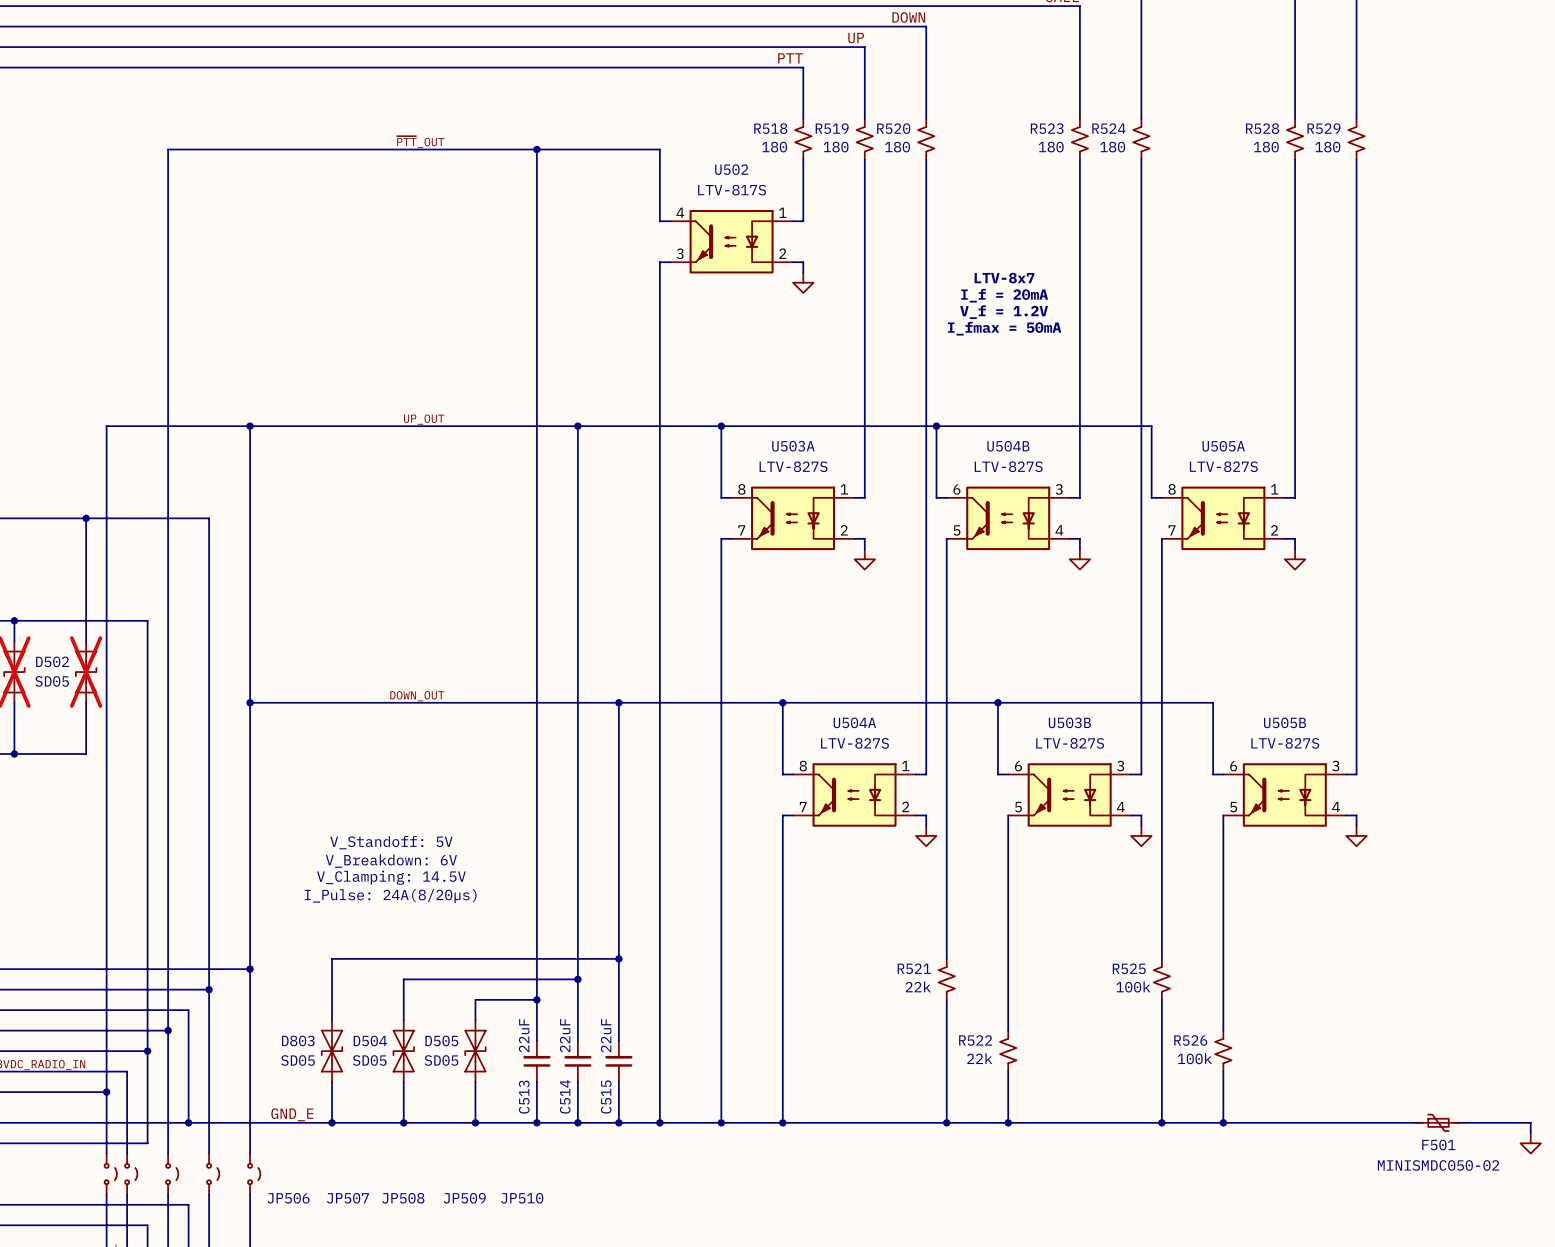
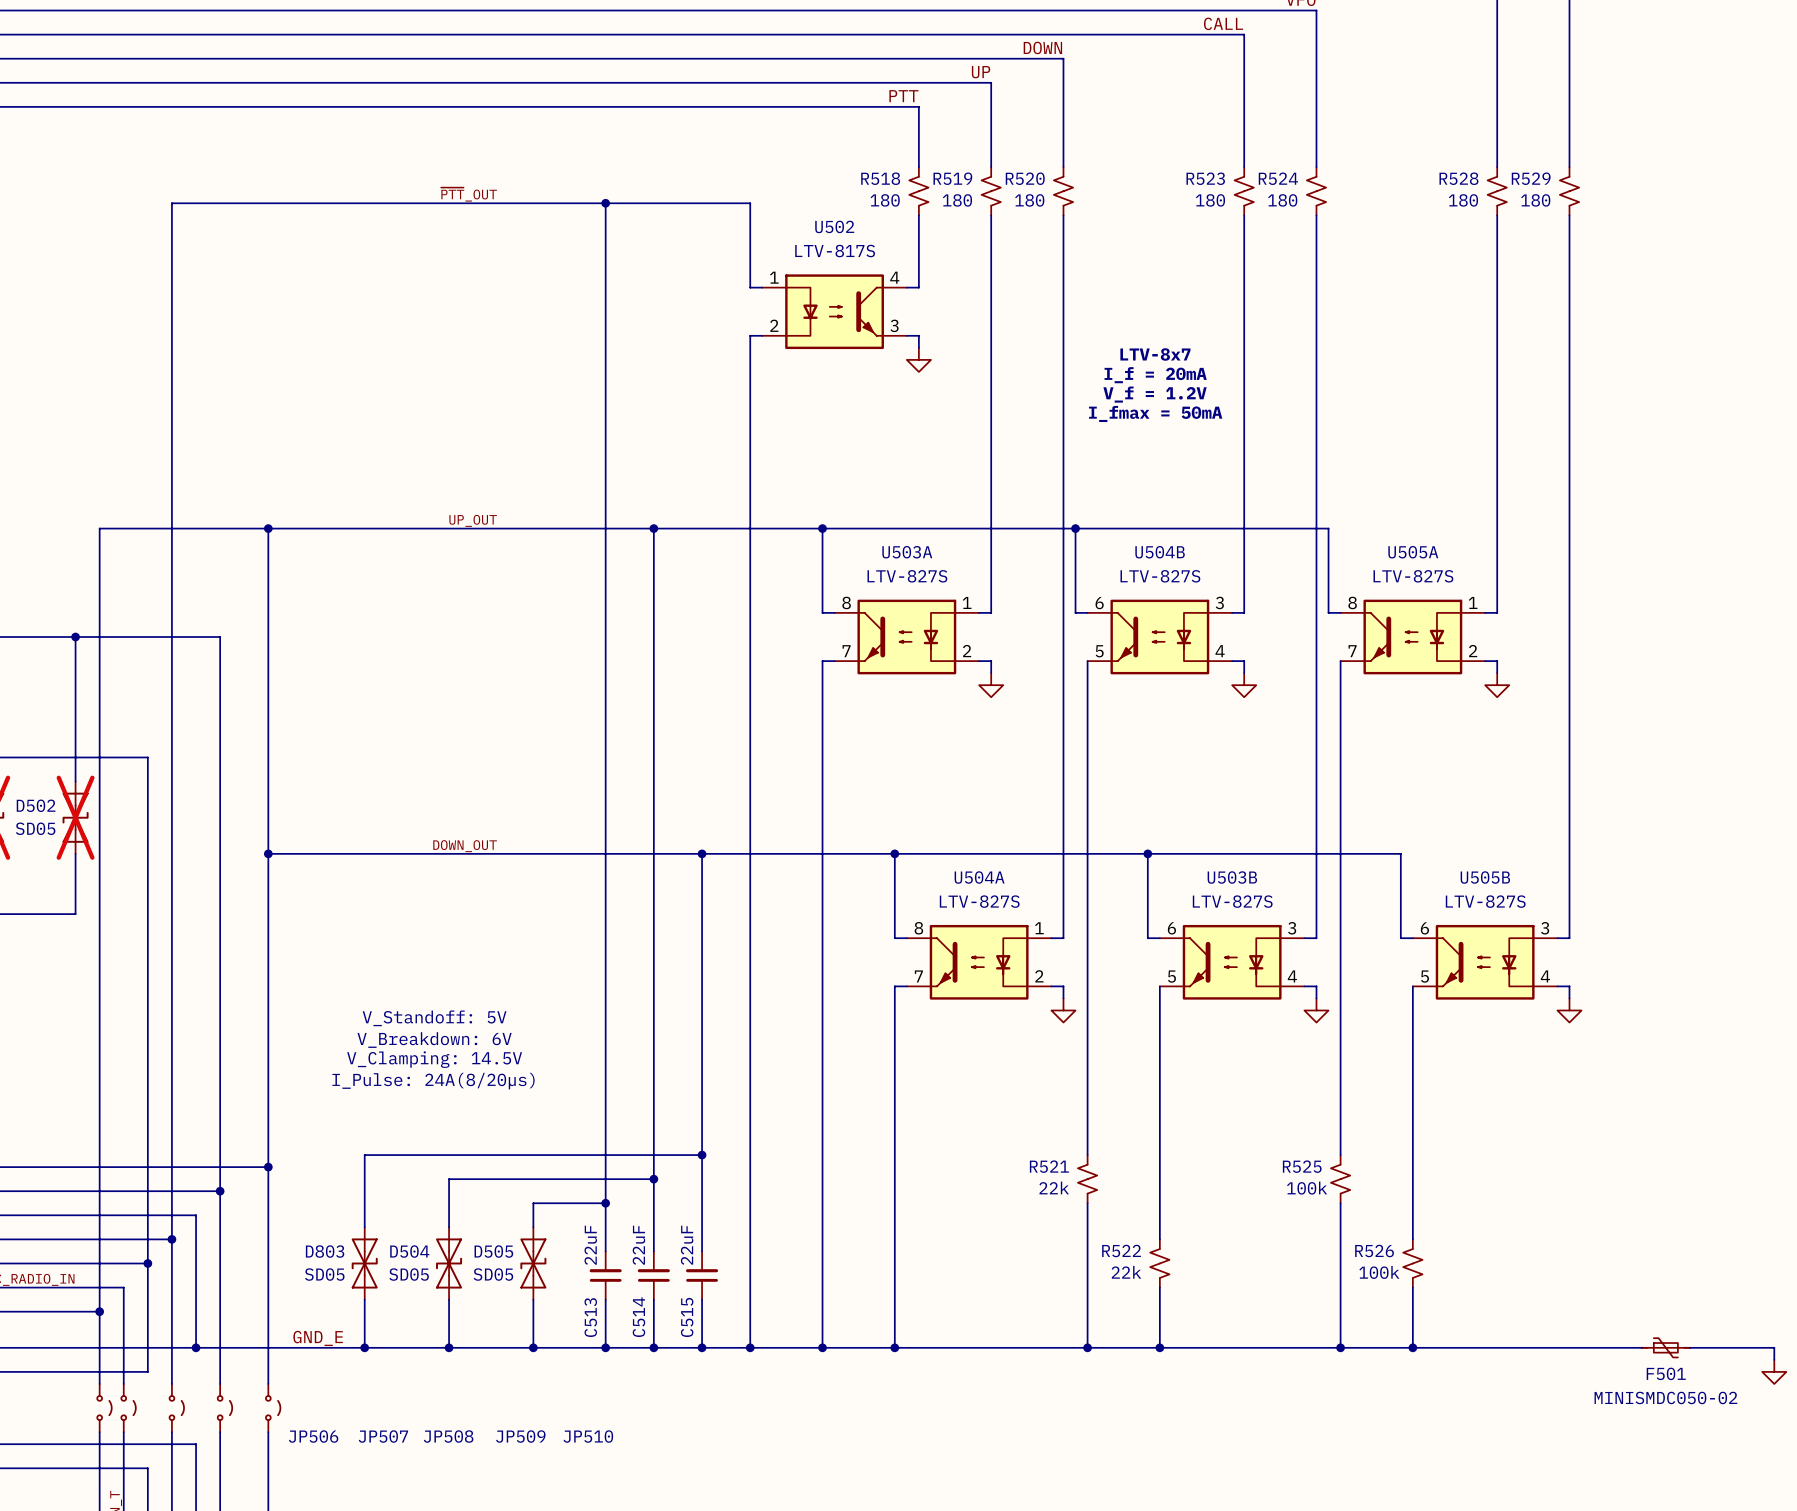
U502 flip: as is (731, 241) -> left-right (834, 311)

